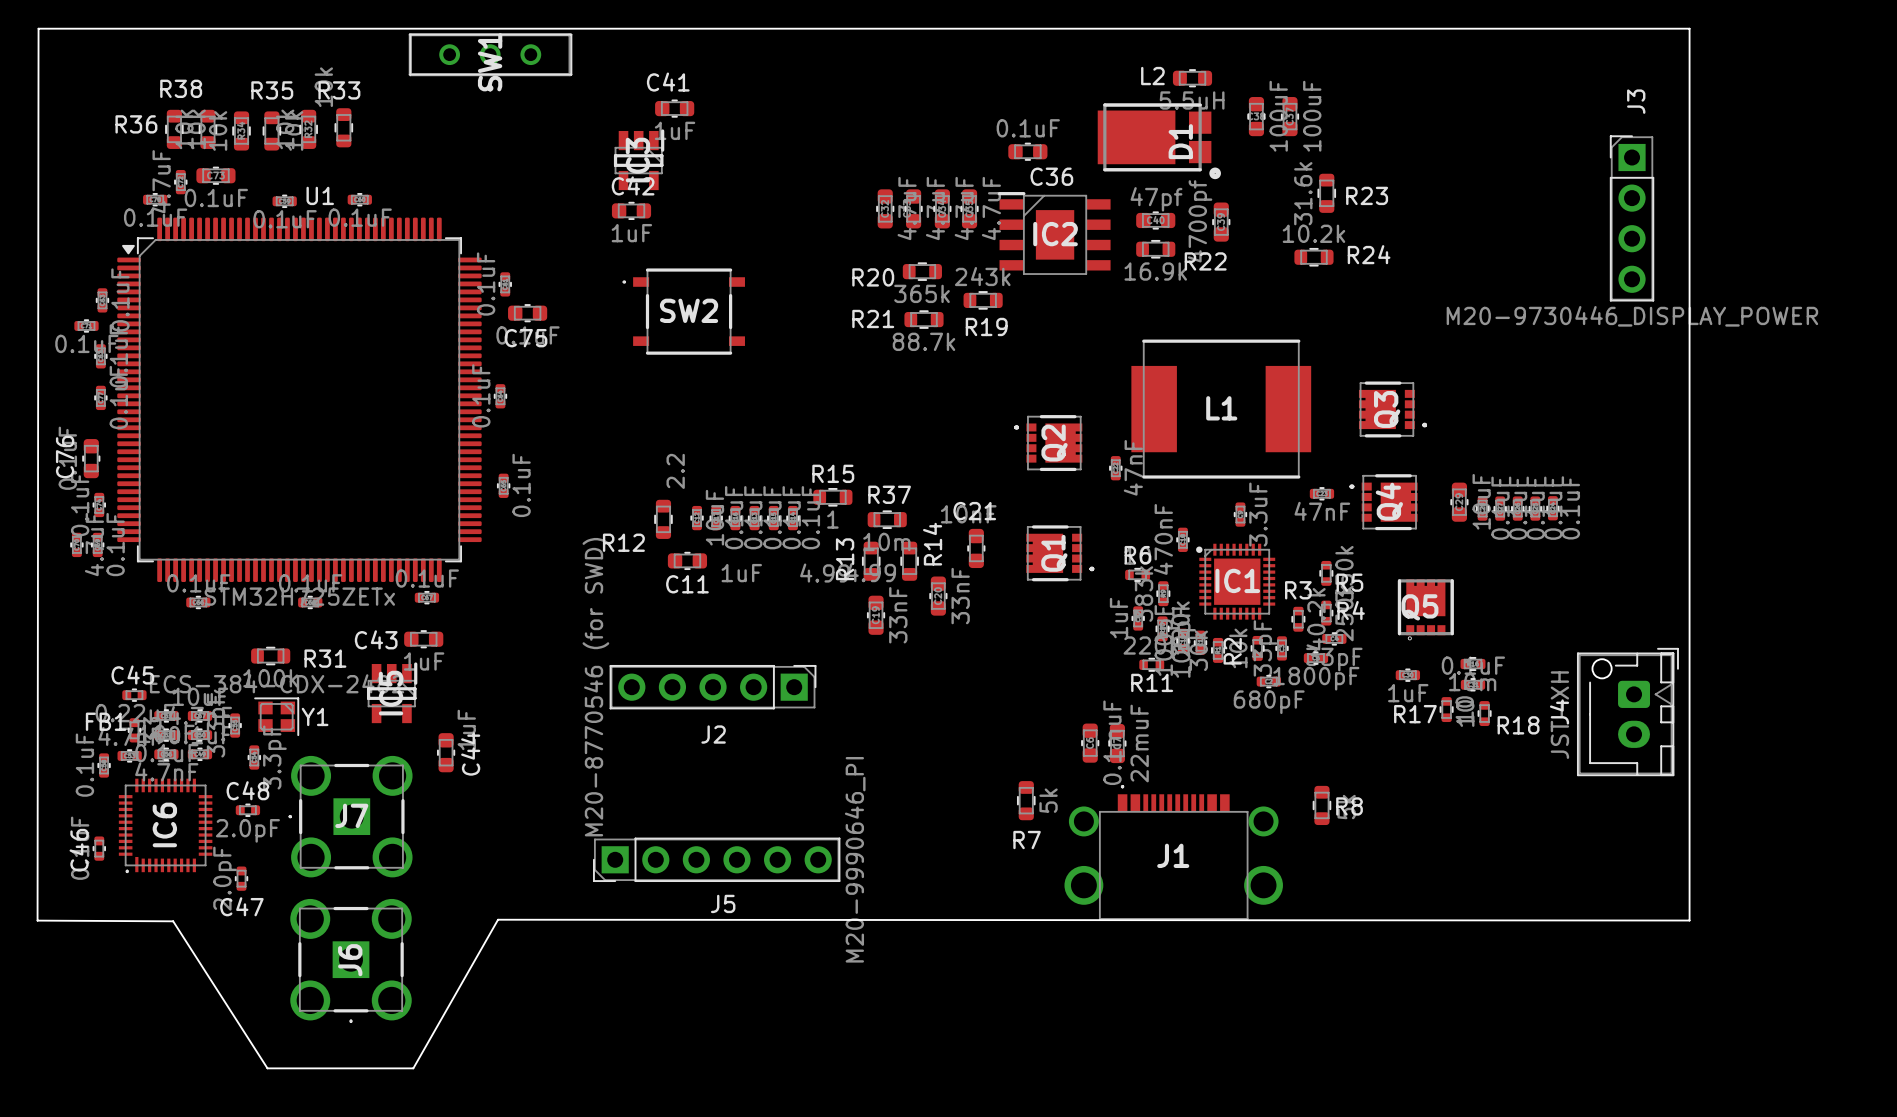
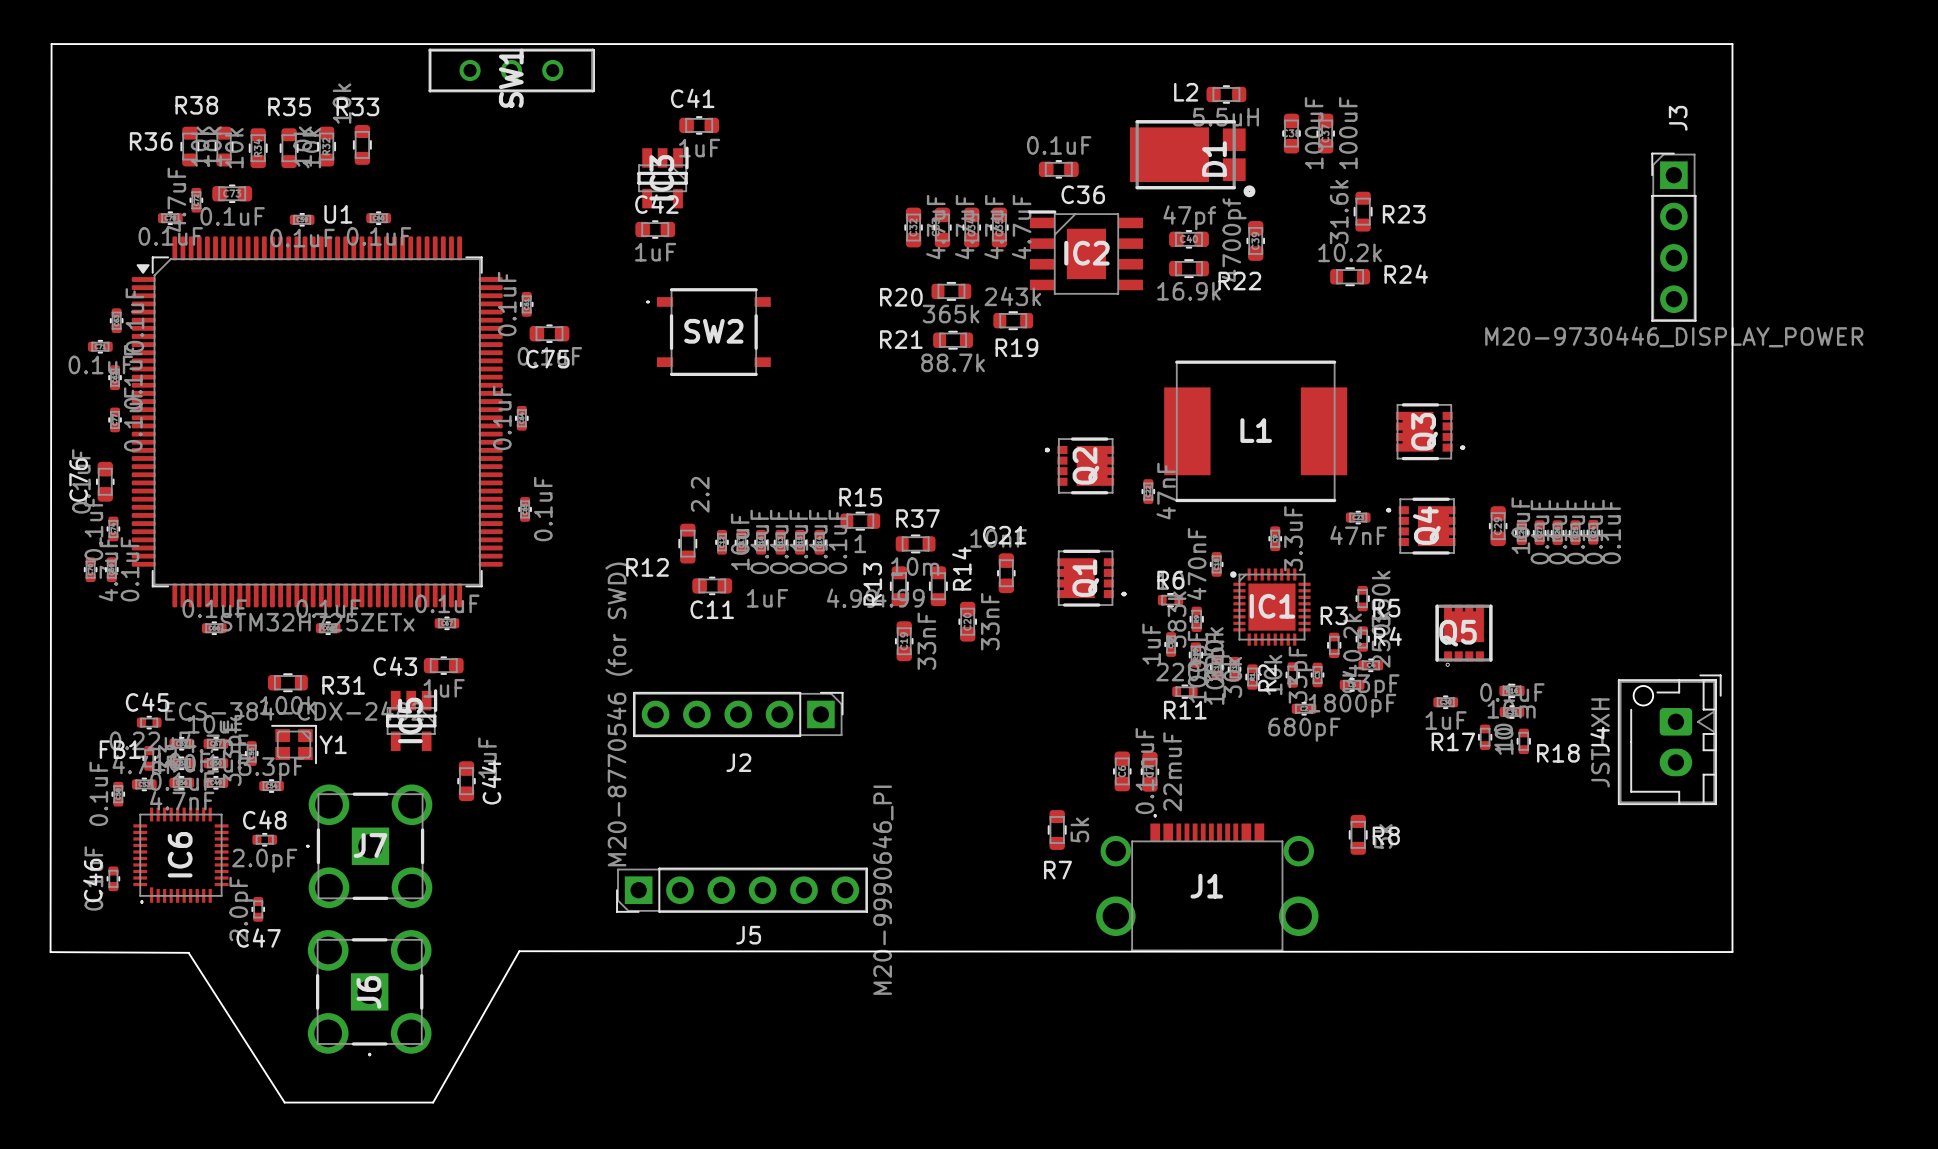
part rotation: 0° (254, 757) -> 90° clockwise (271, 786)

